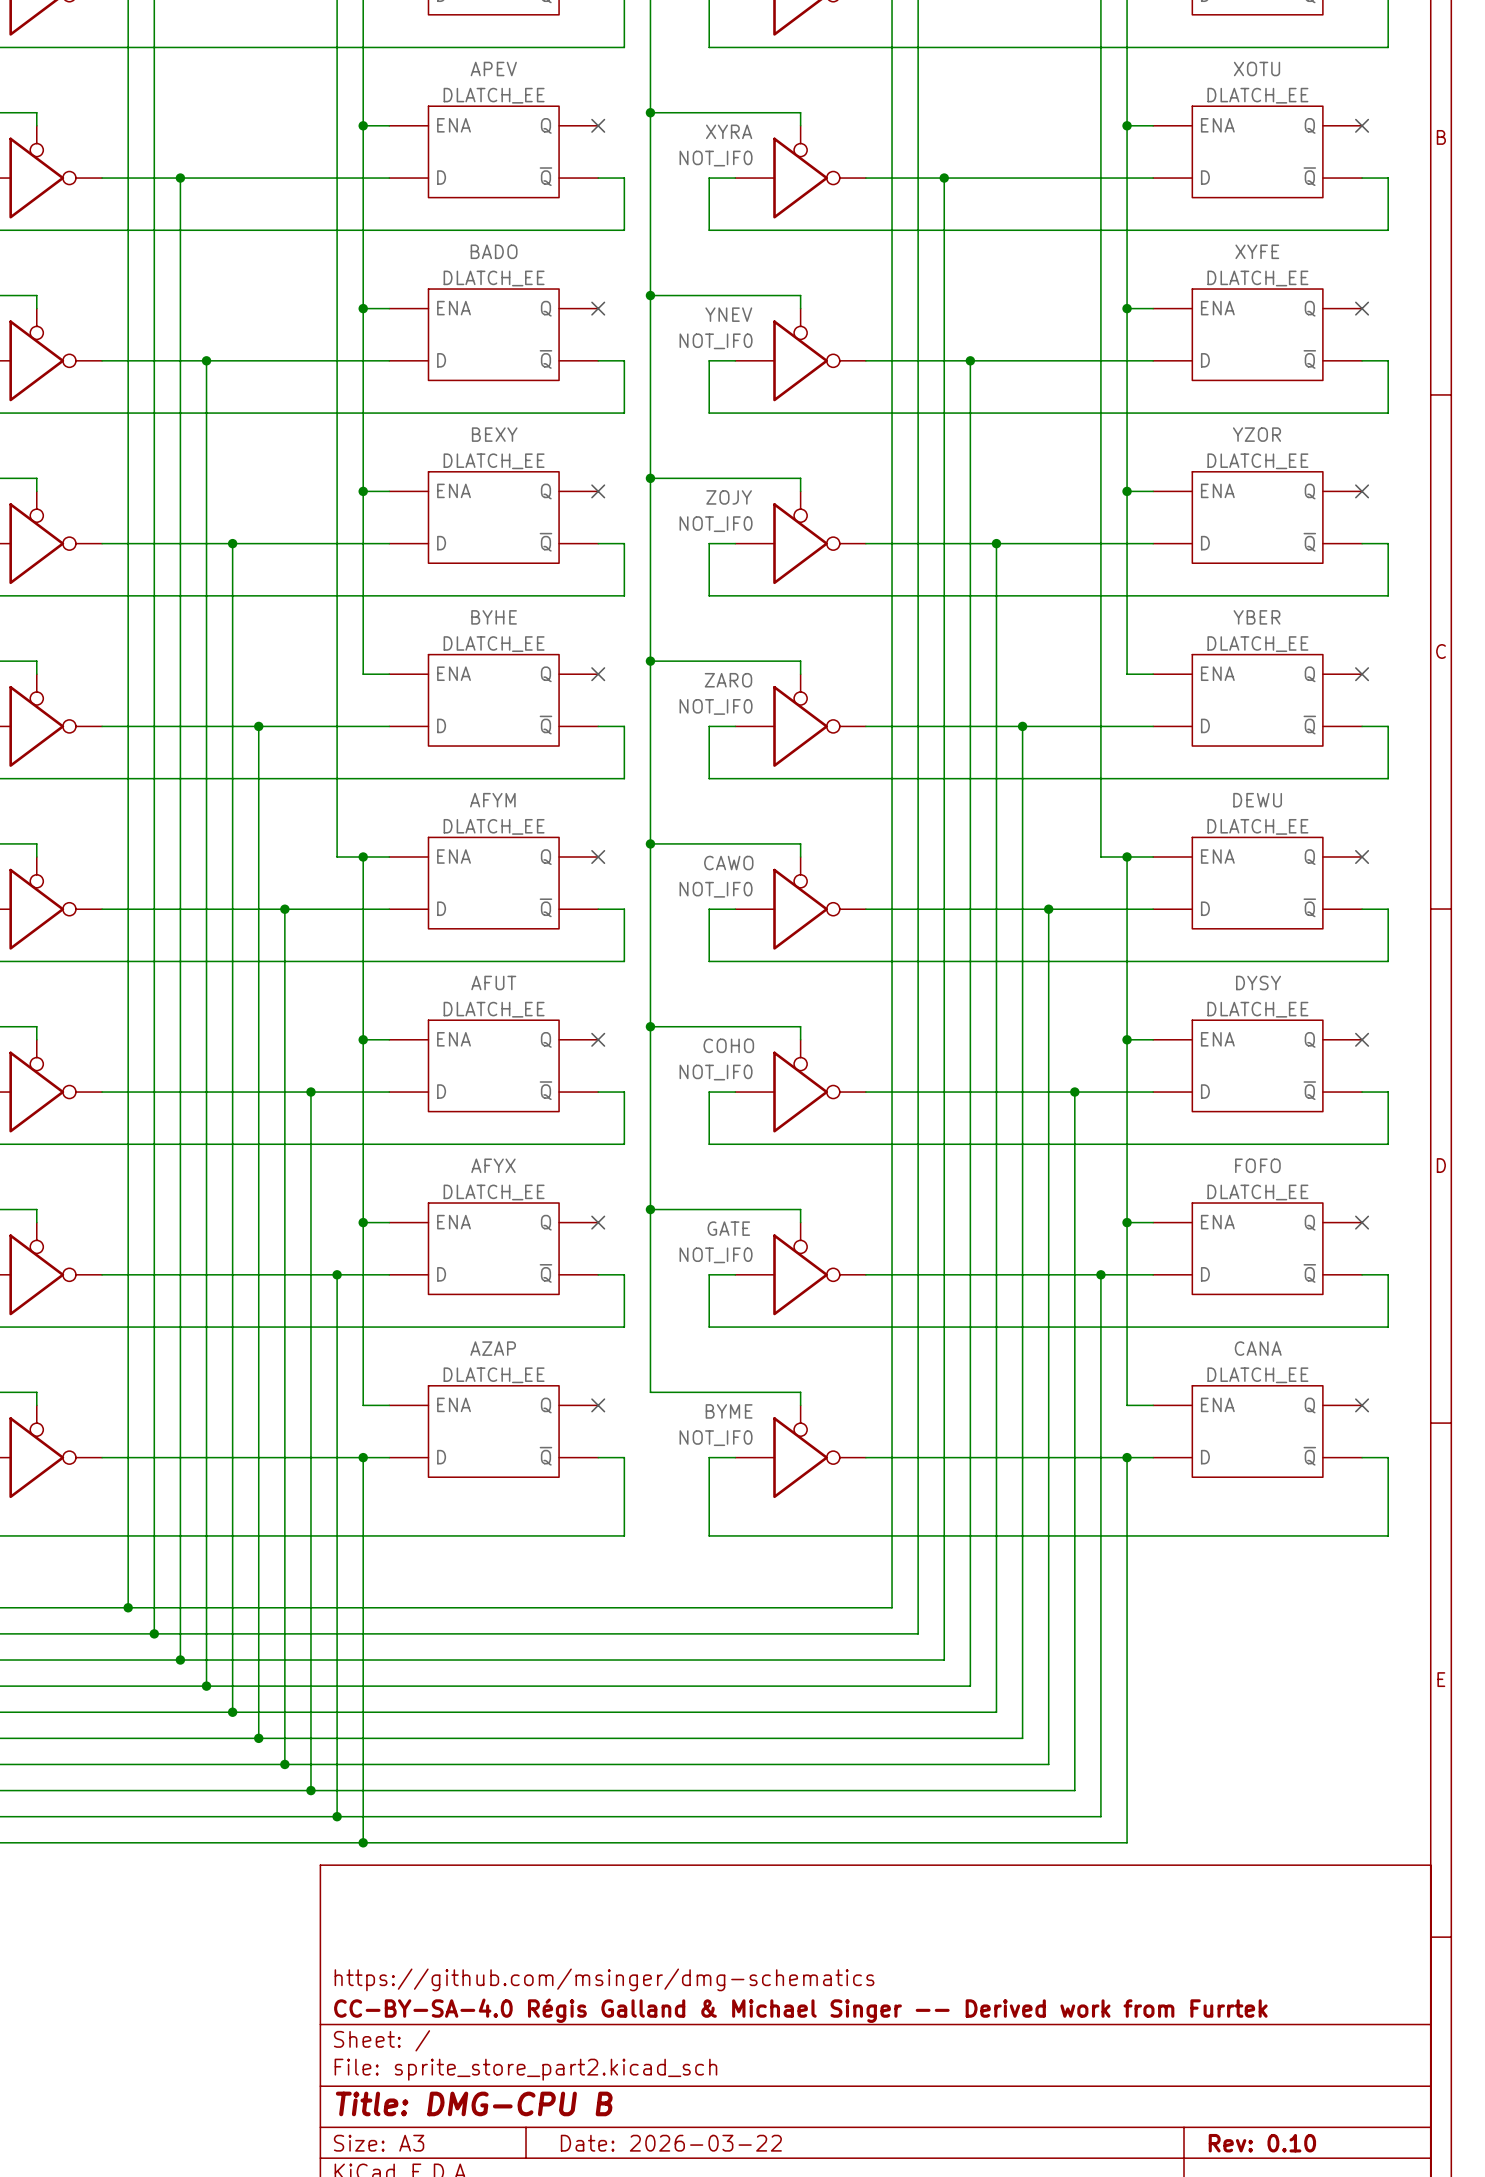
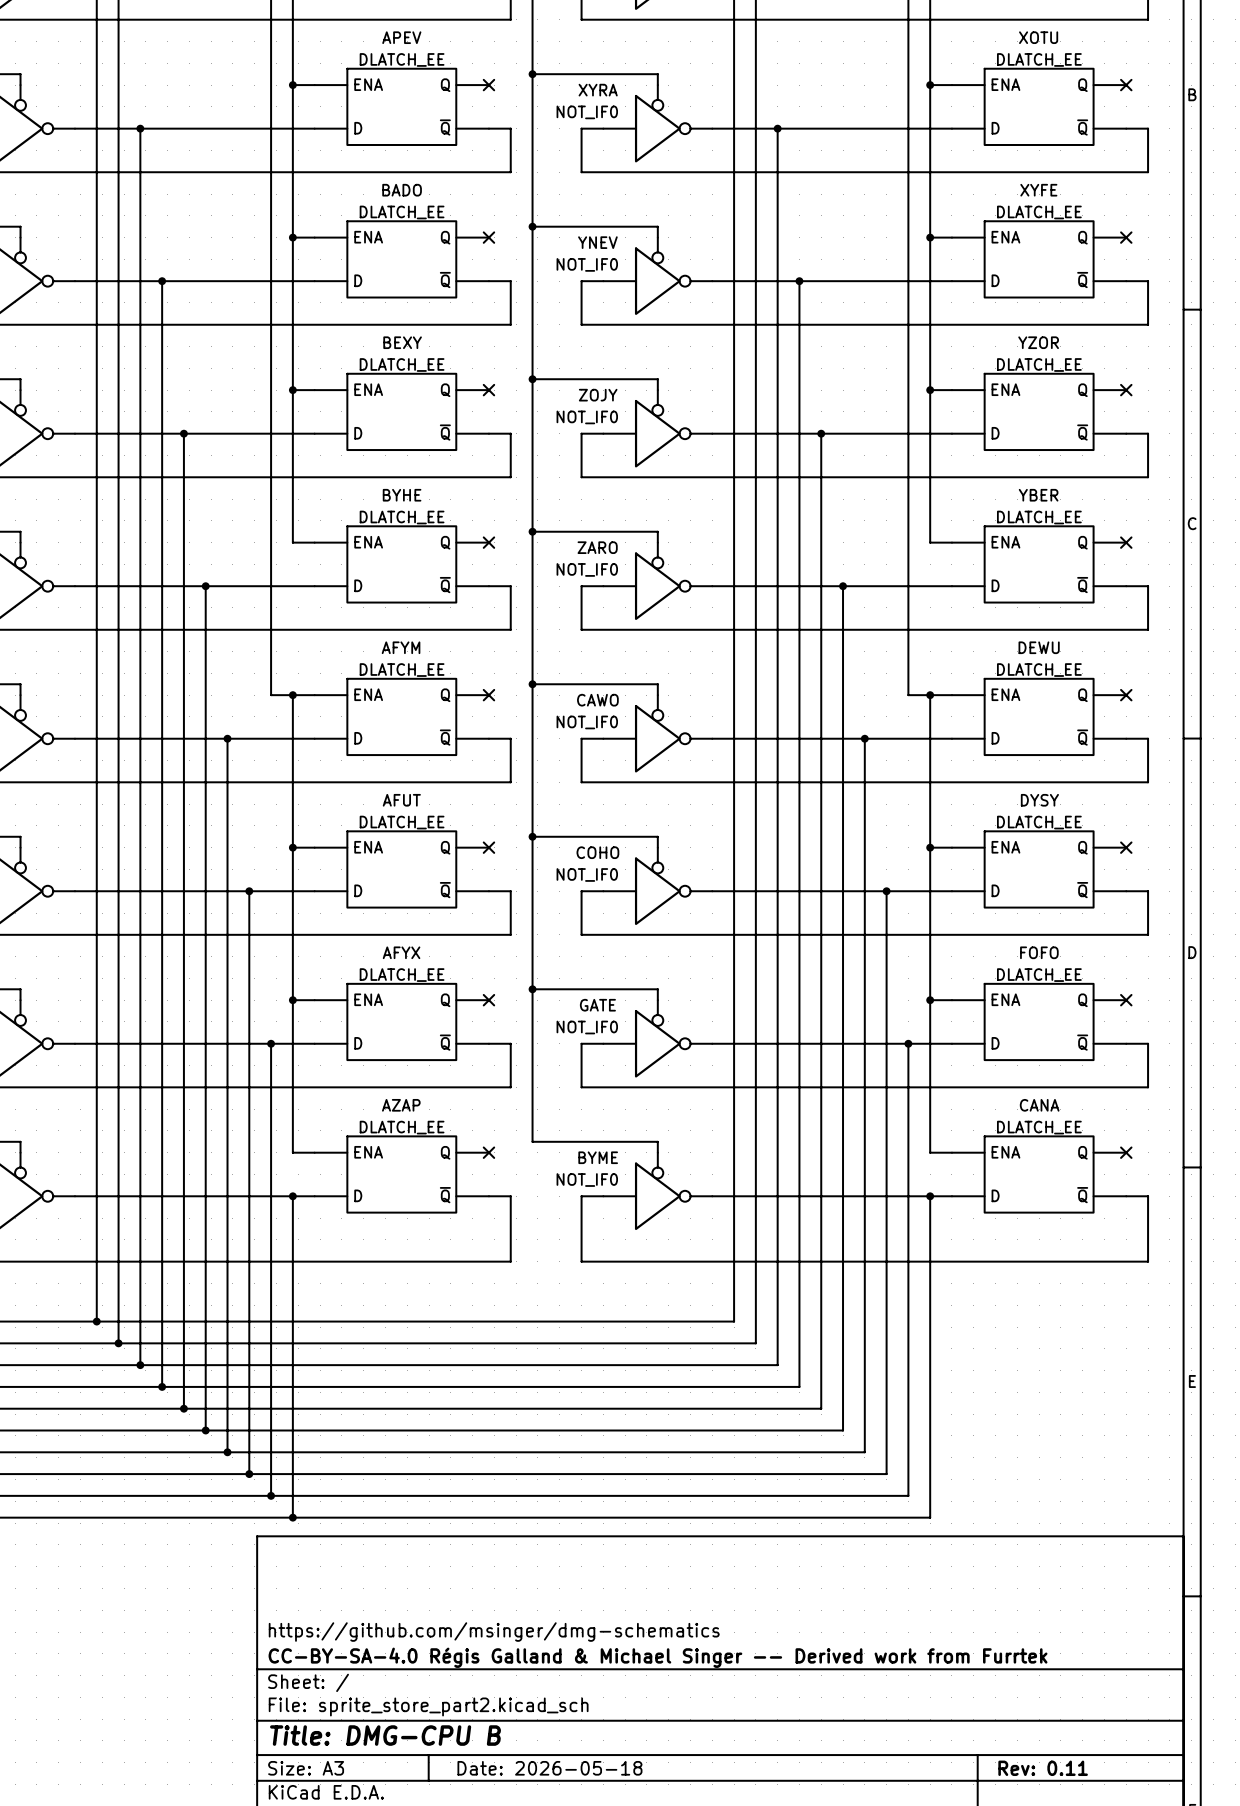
title block: Date: 2026-03-22 (671, 2143) -> Date: 2026-05-18 (549, 1768)
title block: Rev: 0.10 (1262, 2143) -> Rev: 0.11 (1043, 1768)

